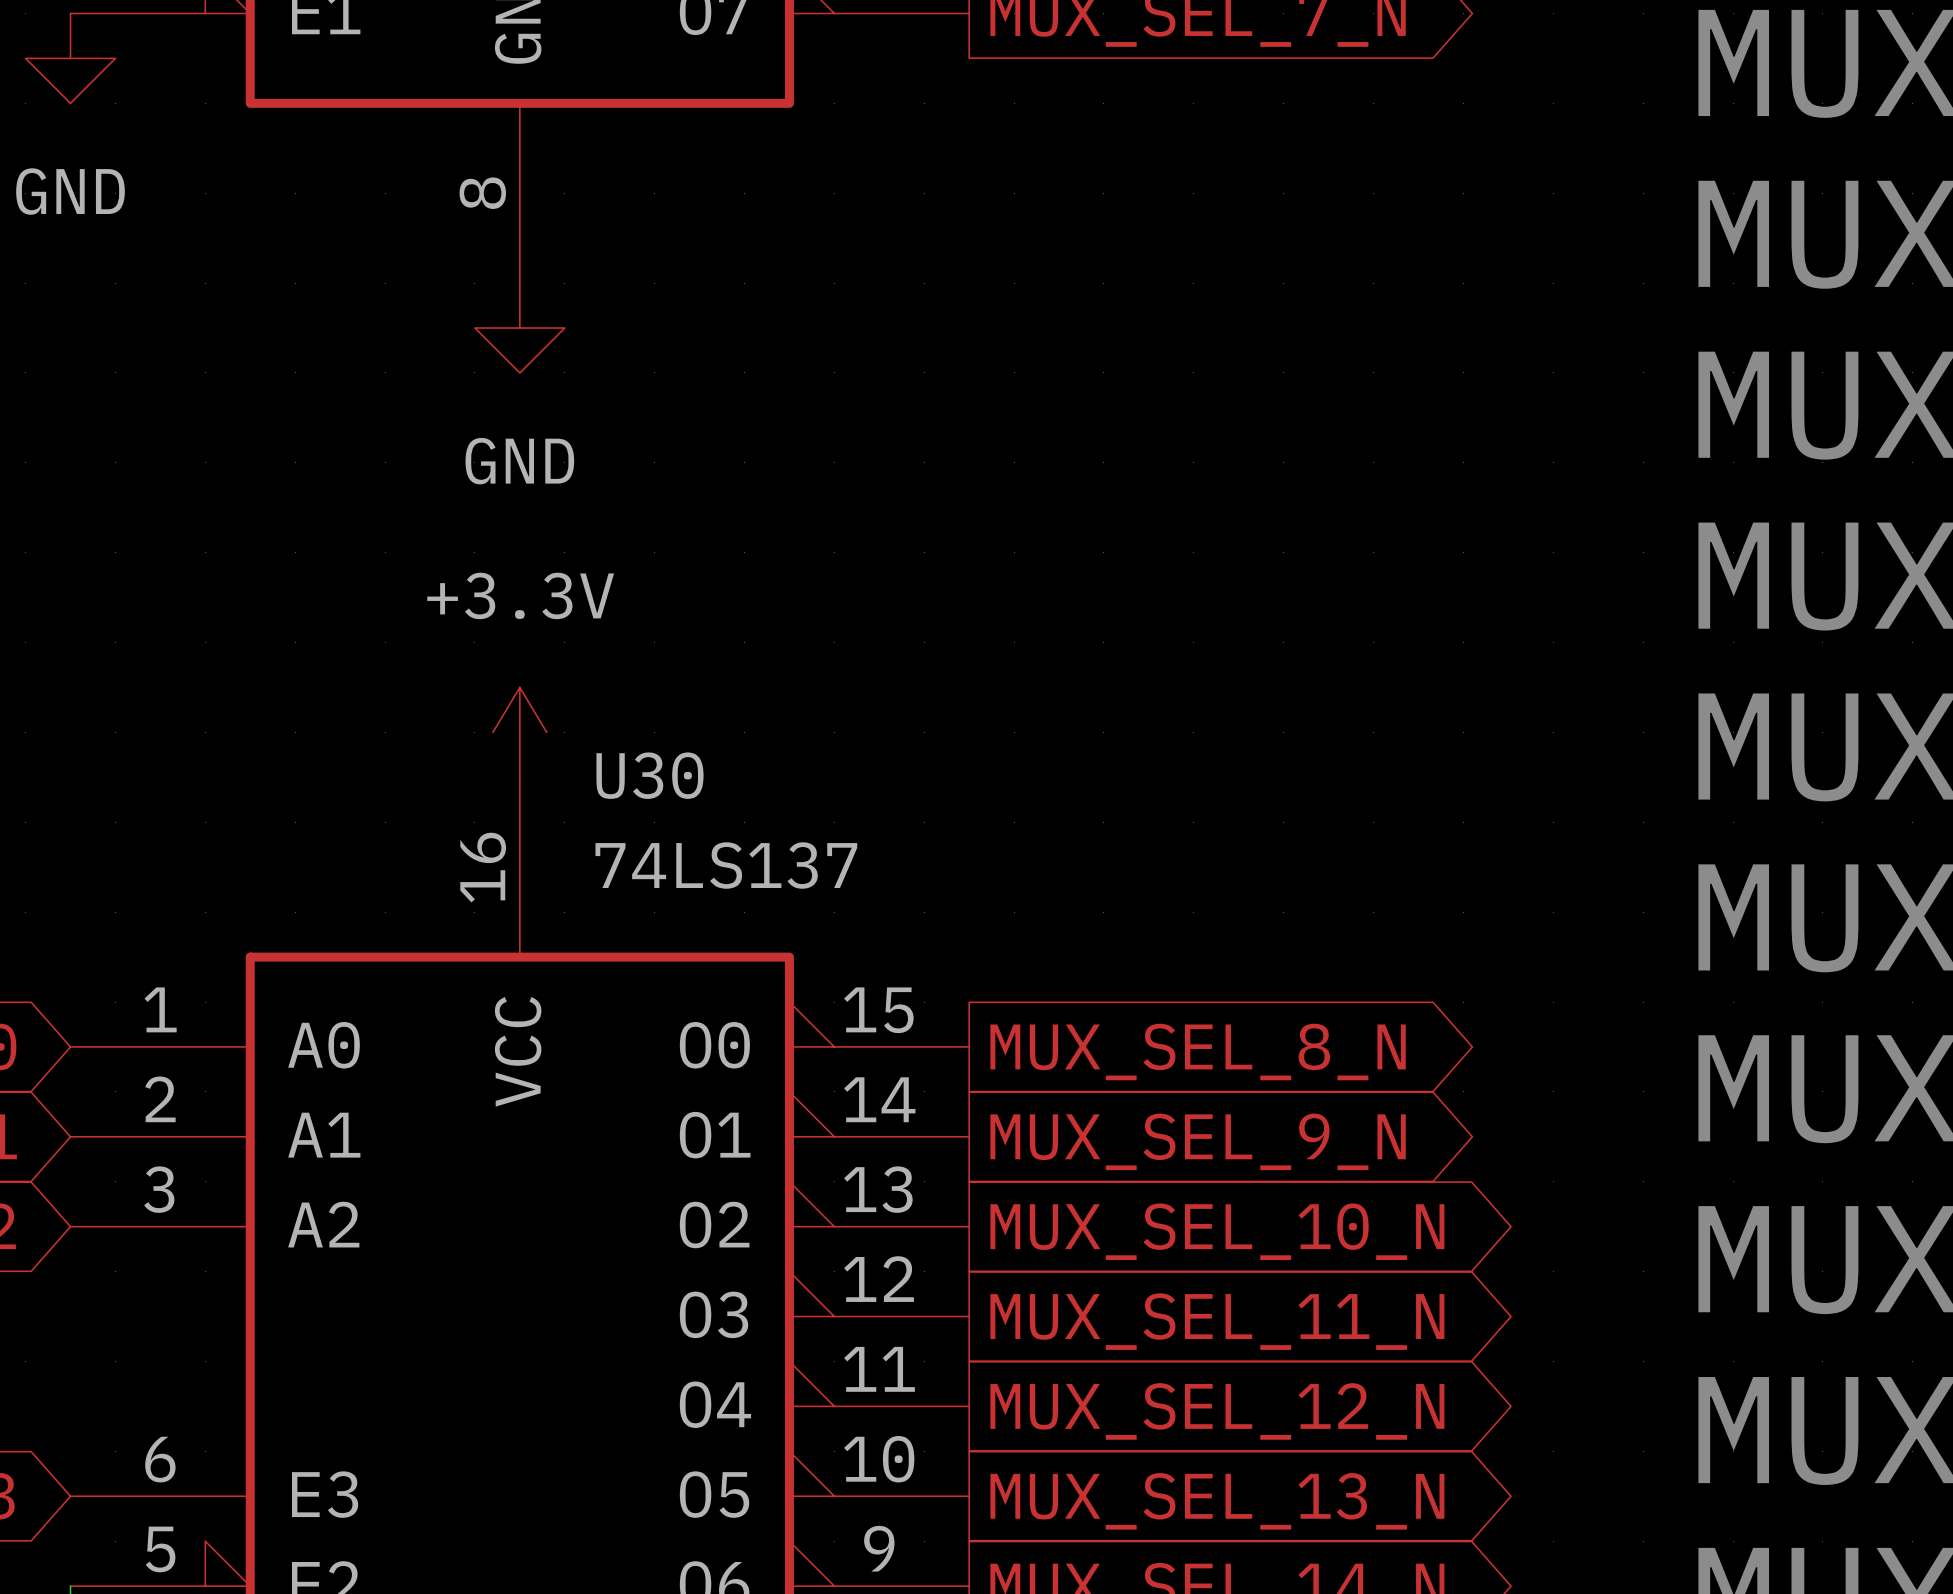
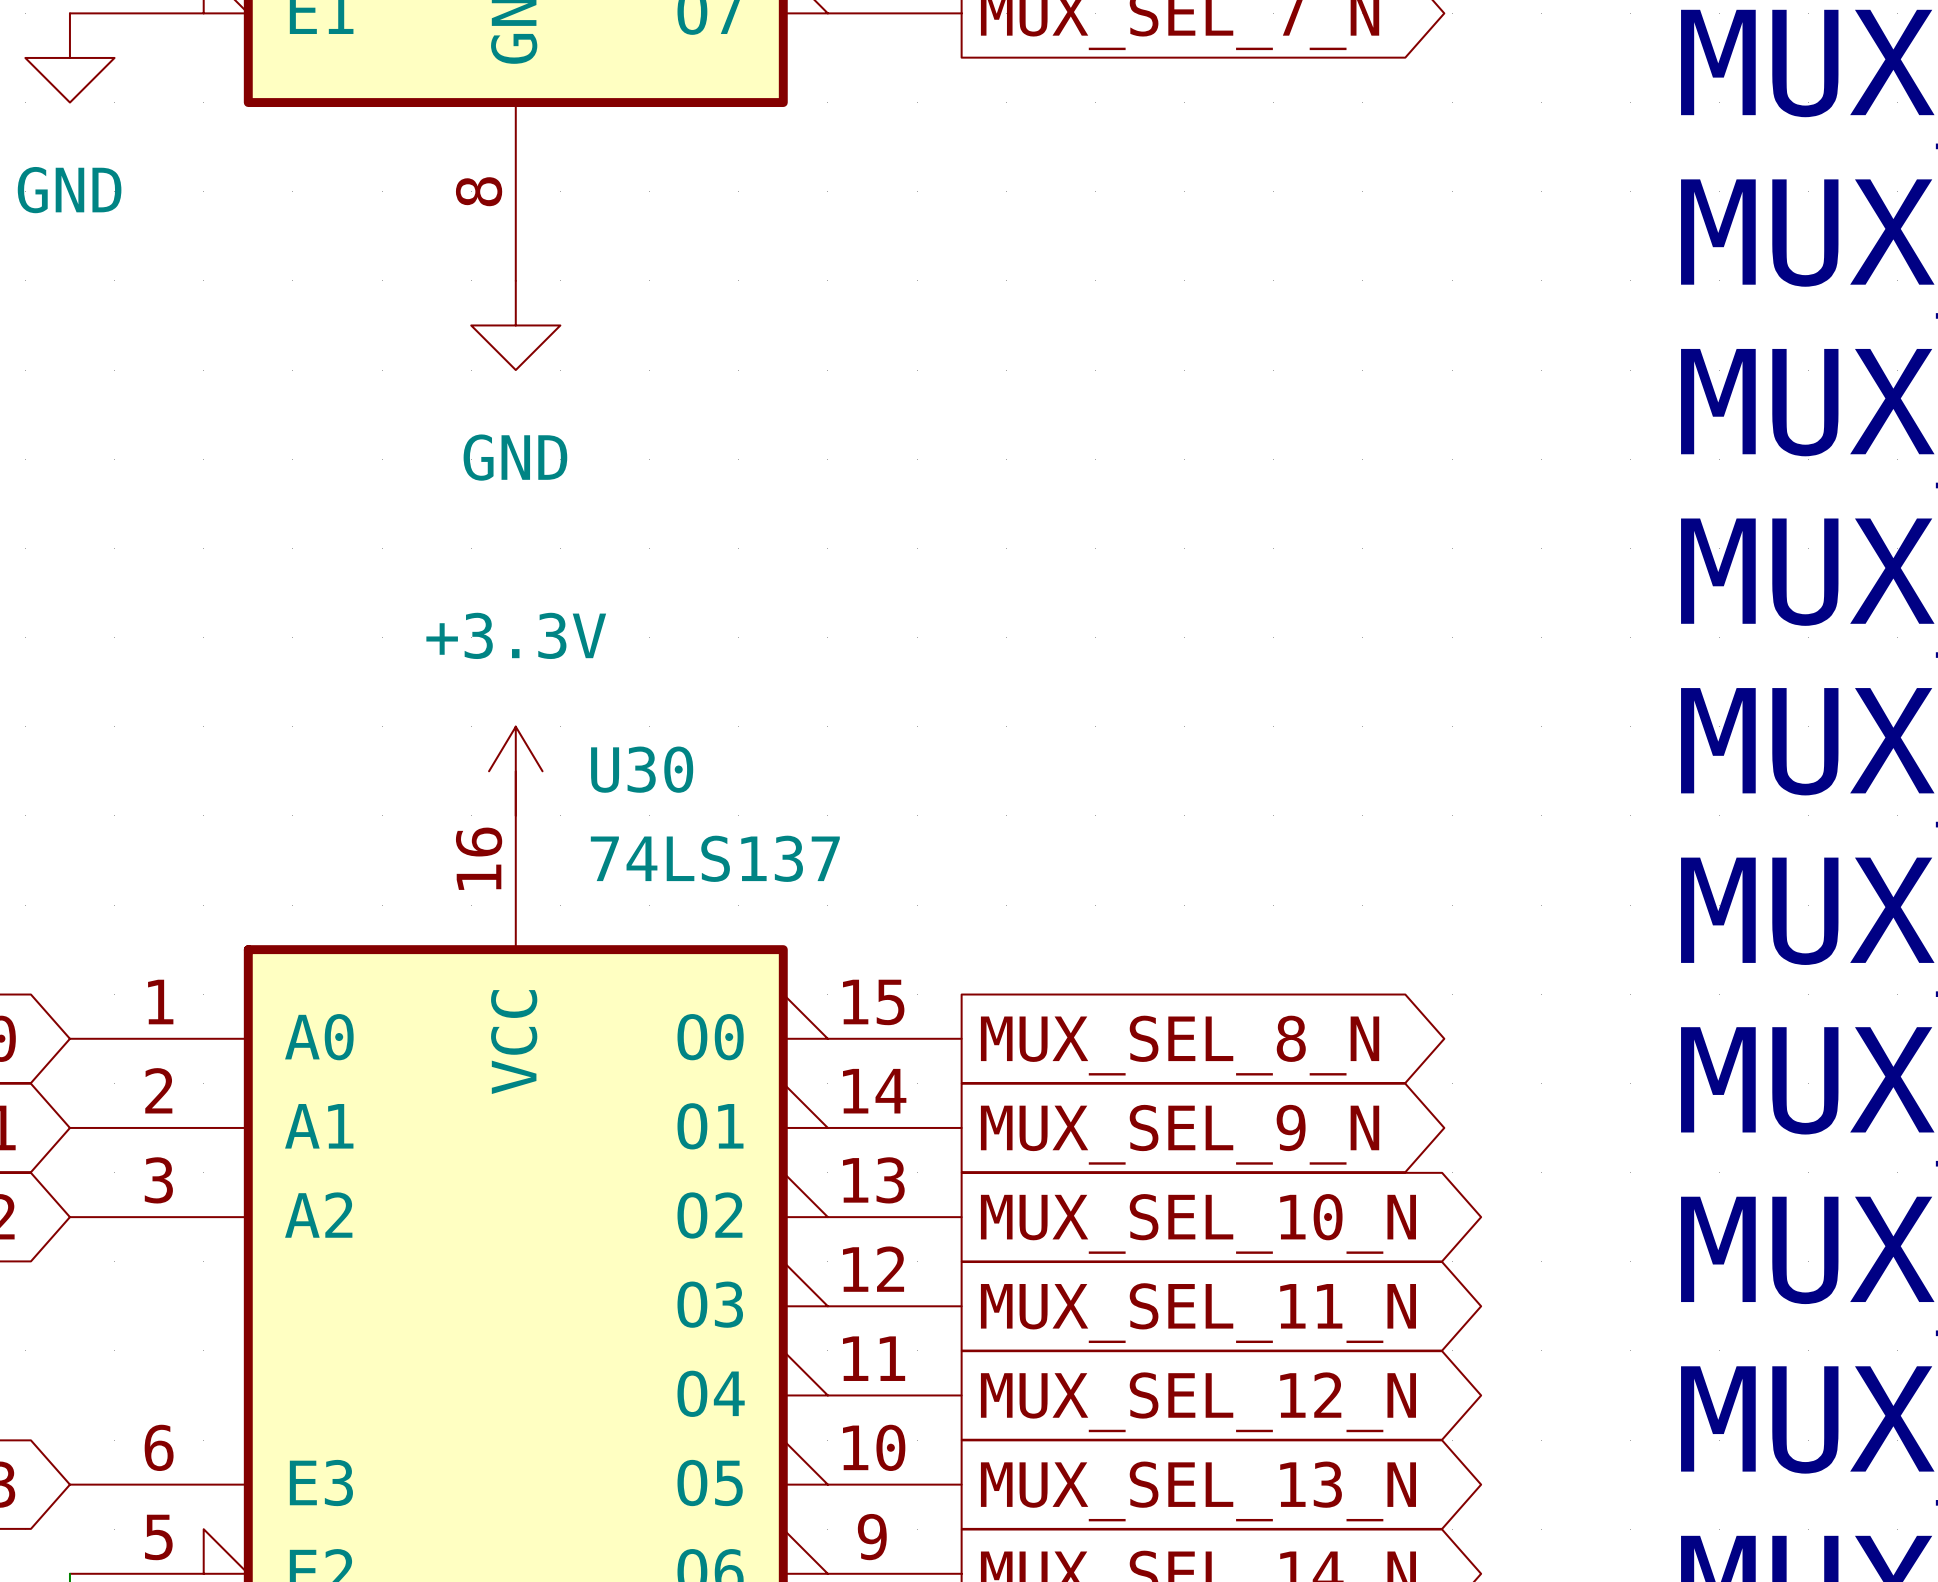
power symbol position: +3.3V (519, 732) -> +3.3V (515, 771)

